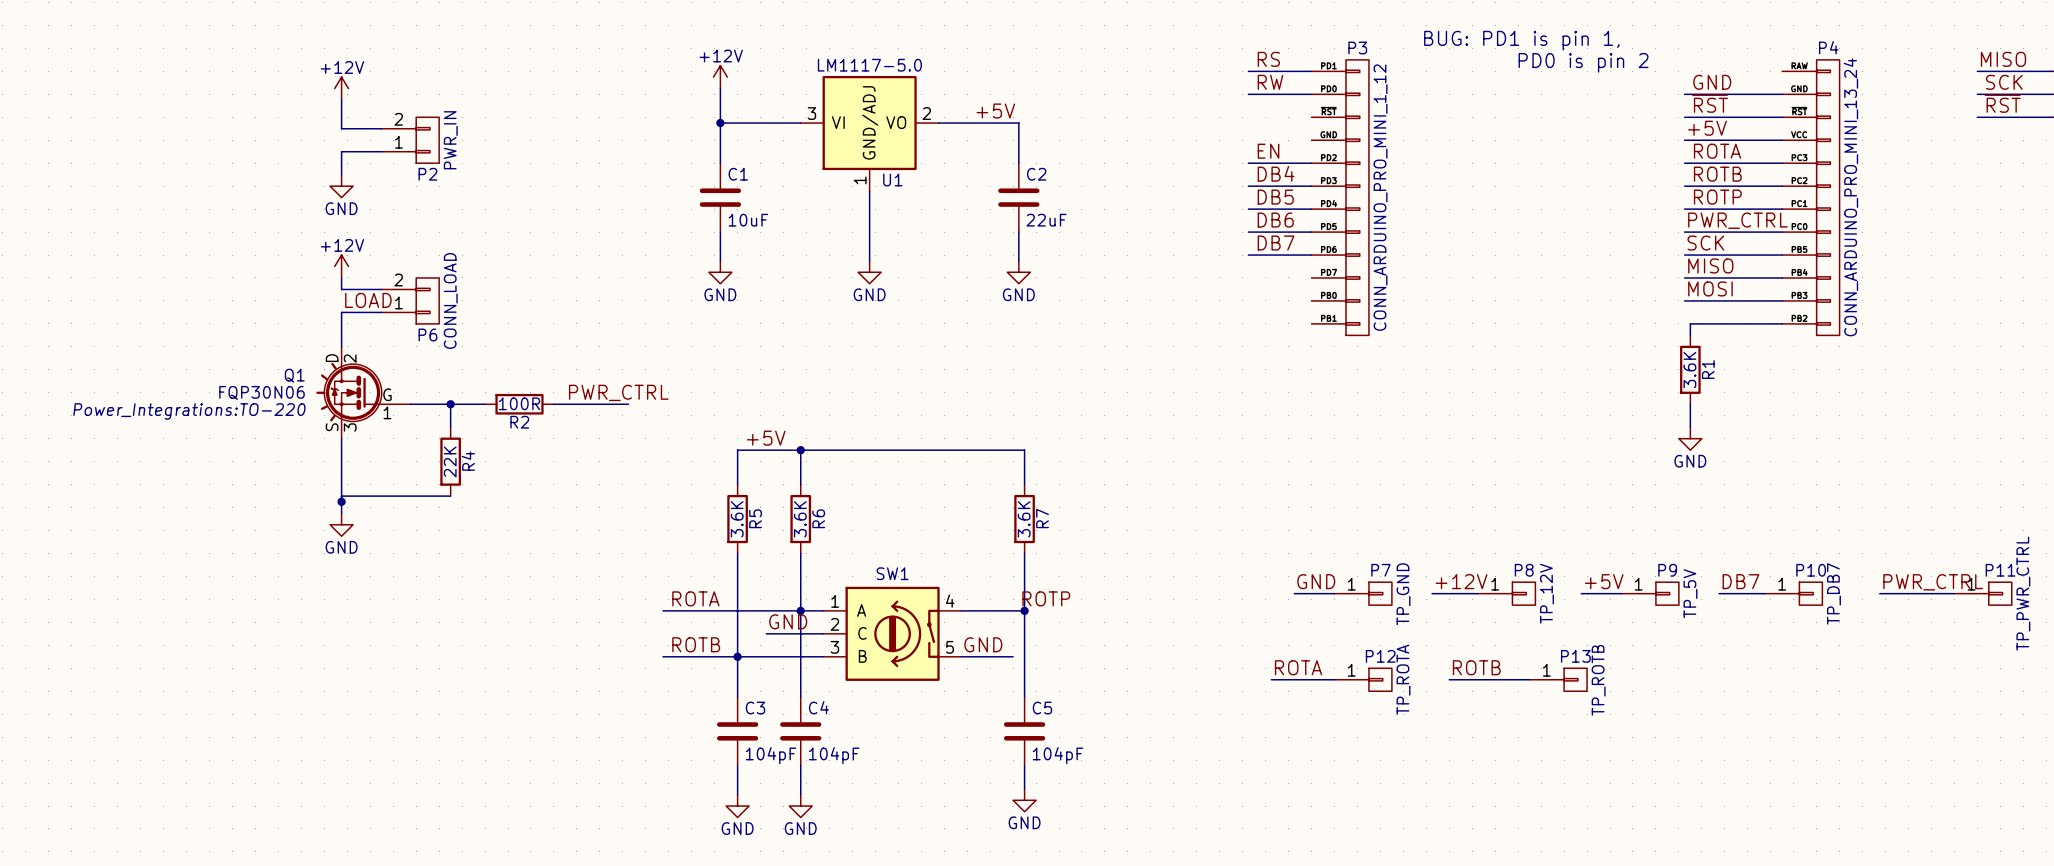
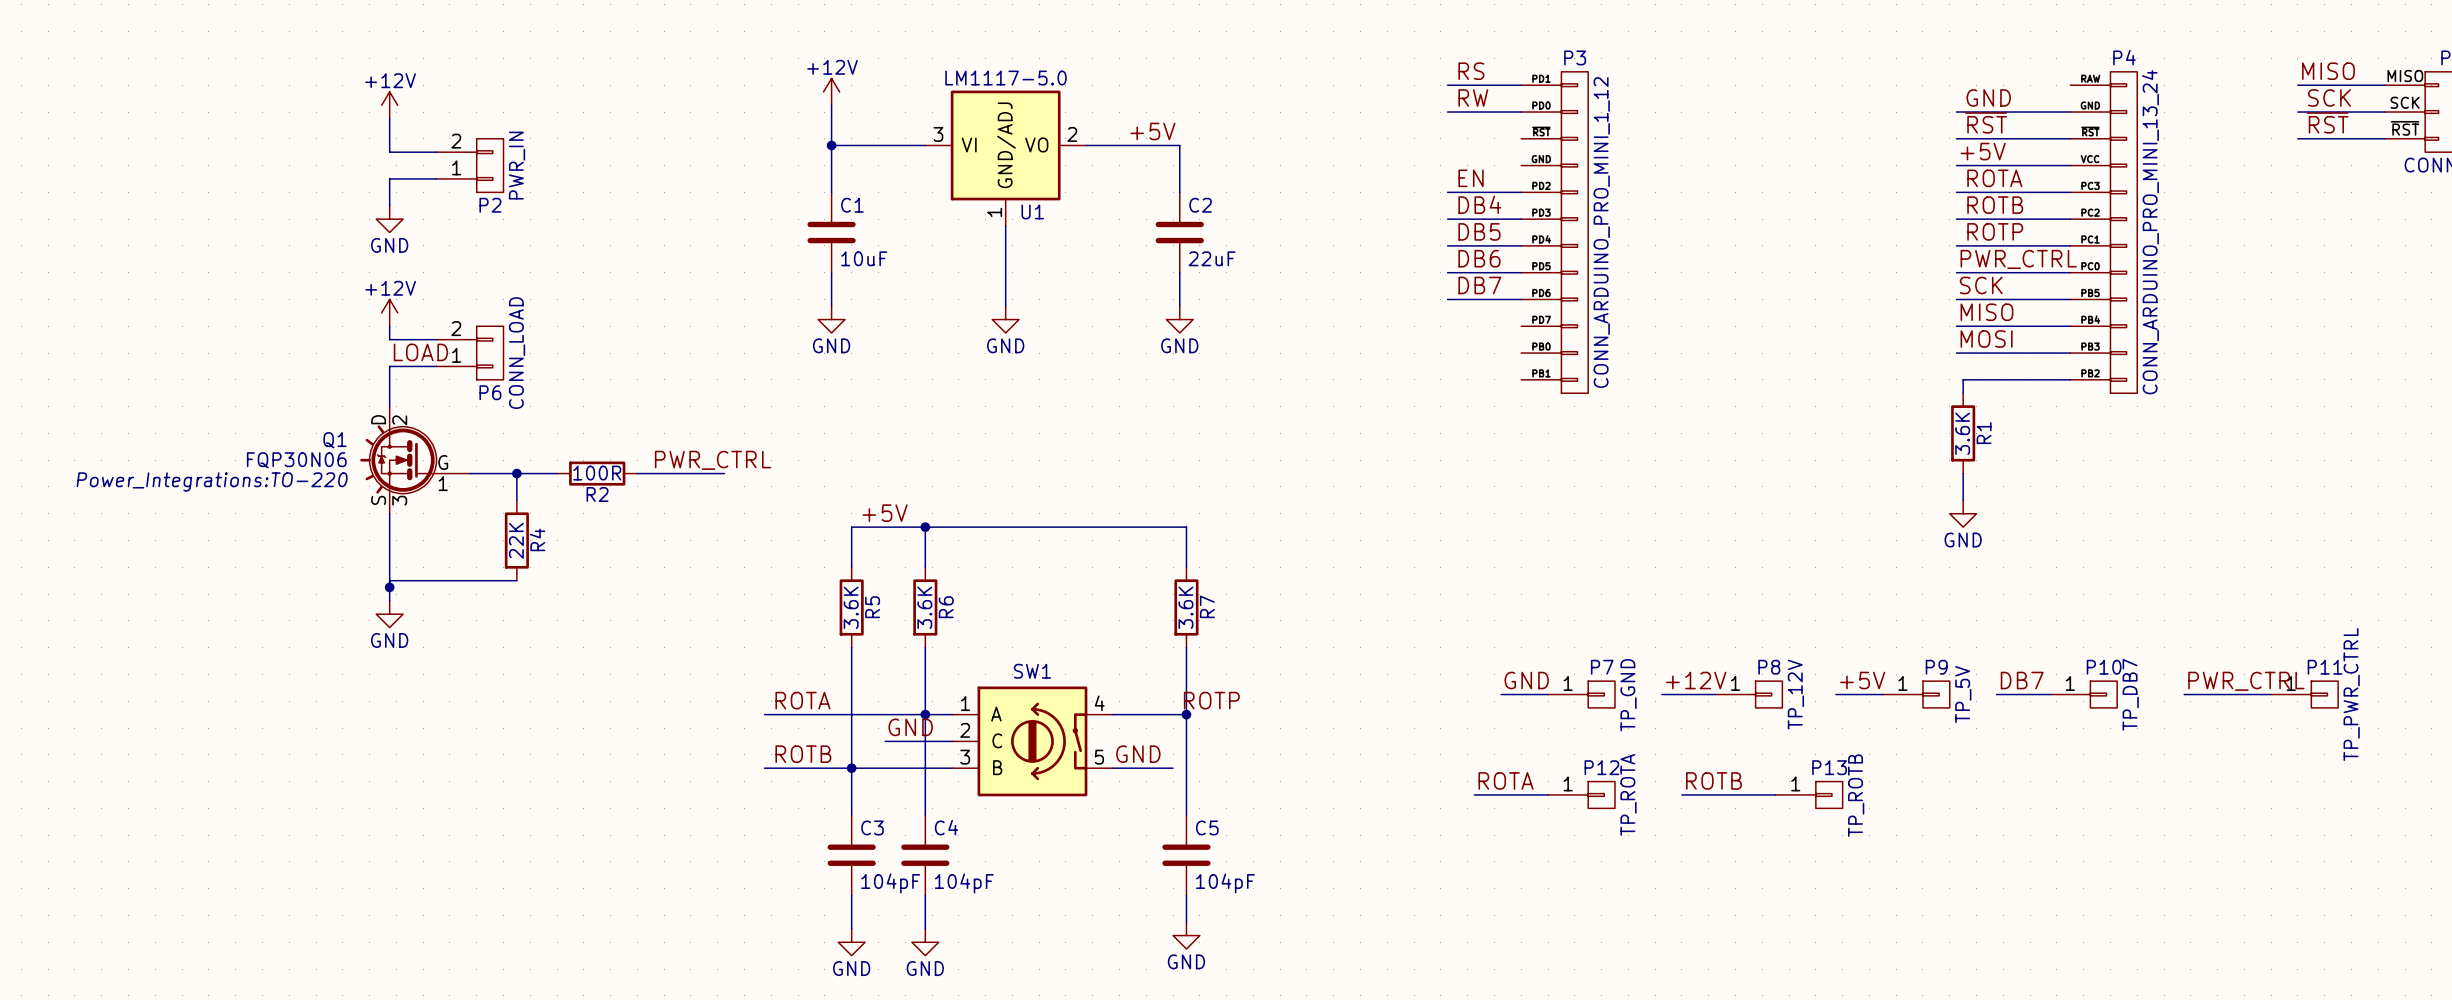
text: BUG: PD1 is pin 1, (1521, 40) -> none
text: PD0 is pin 2 (1583, 62) -> none

